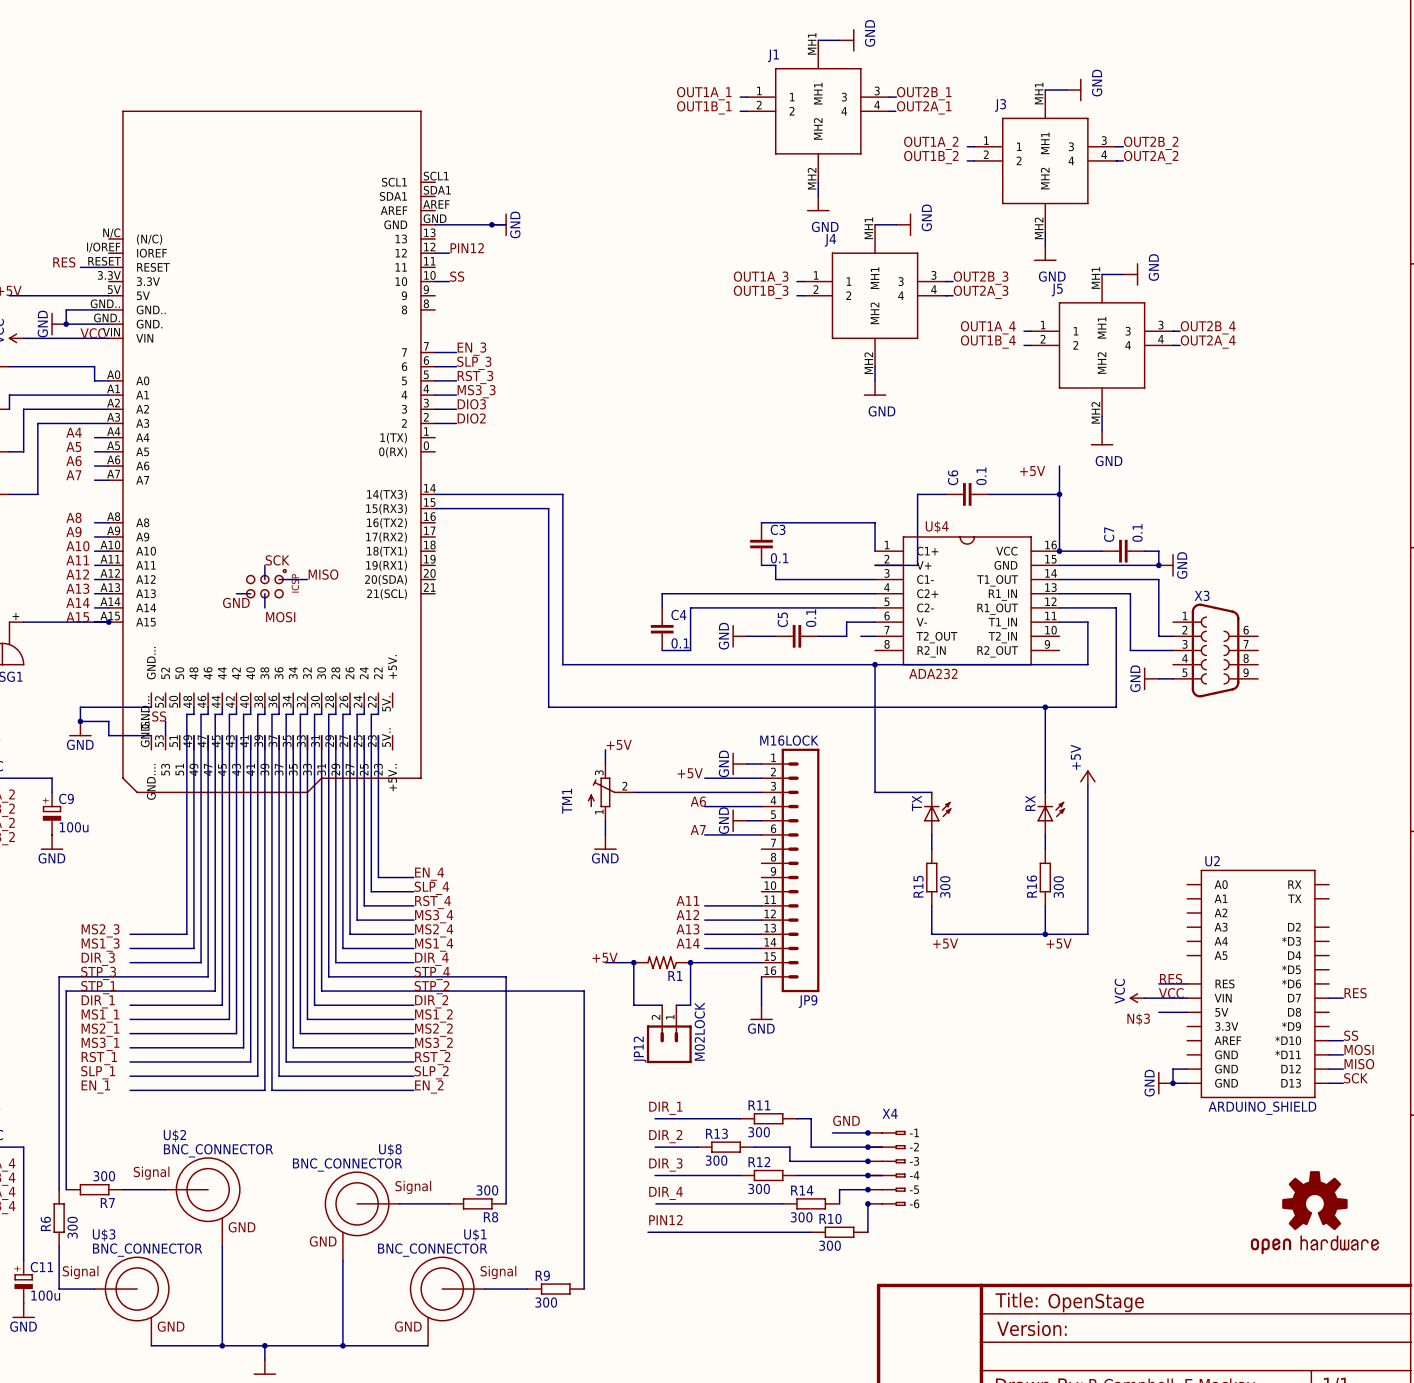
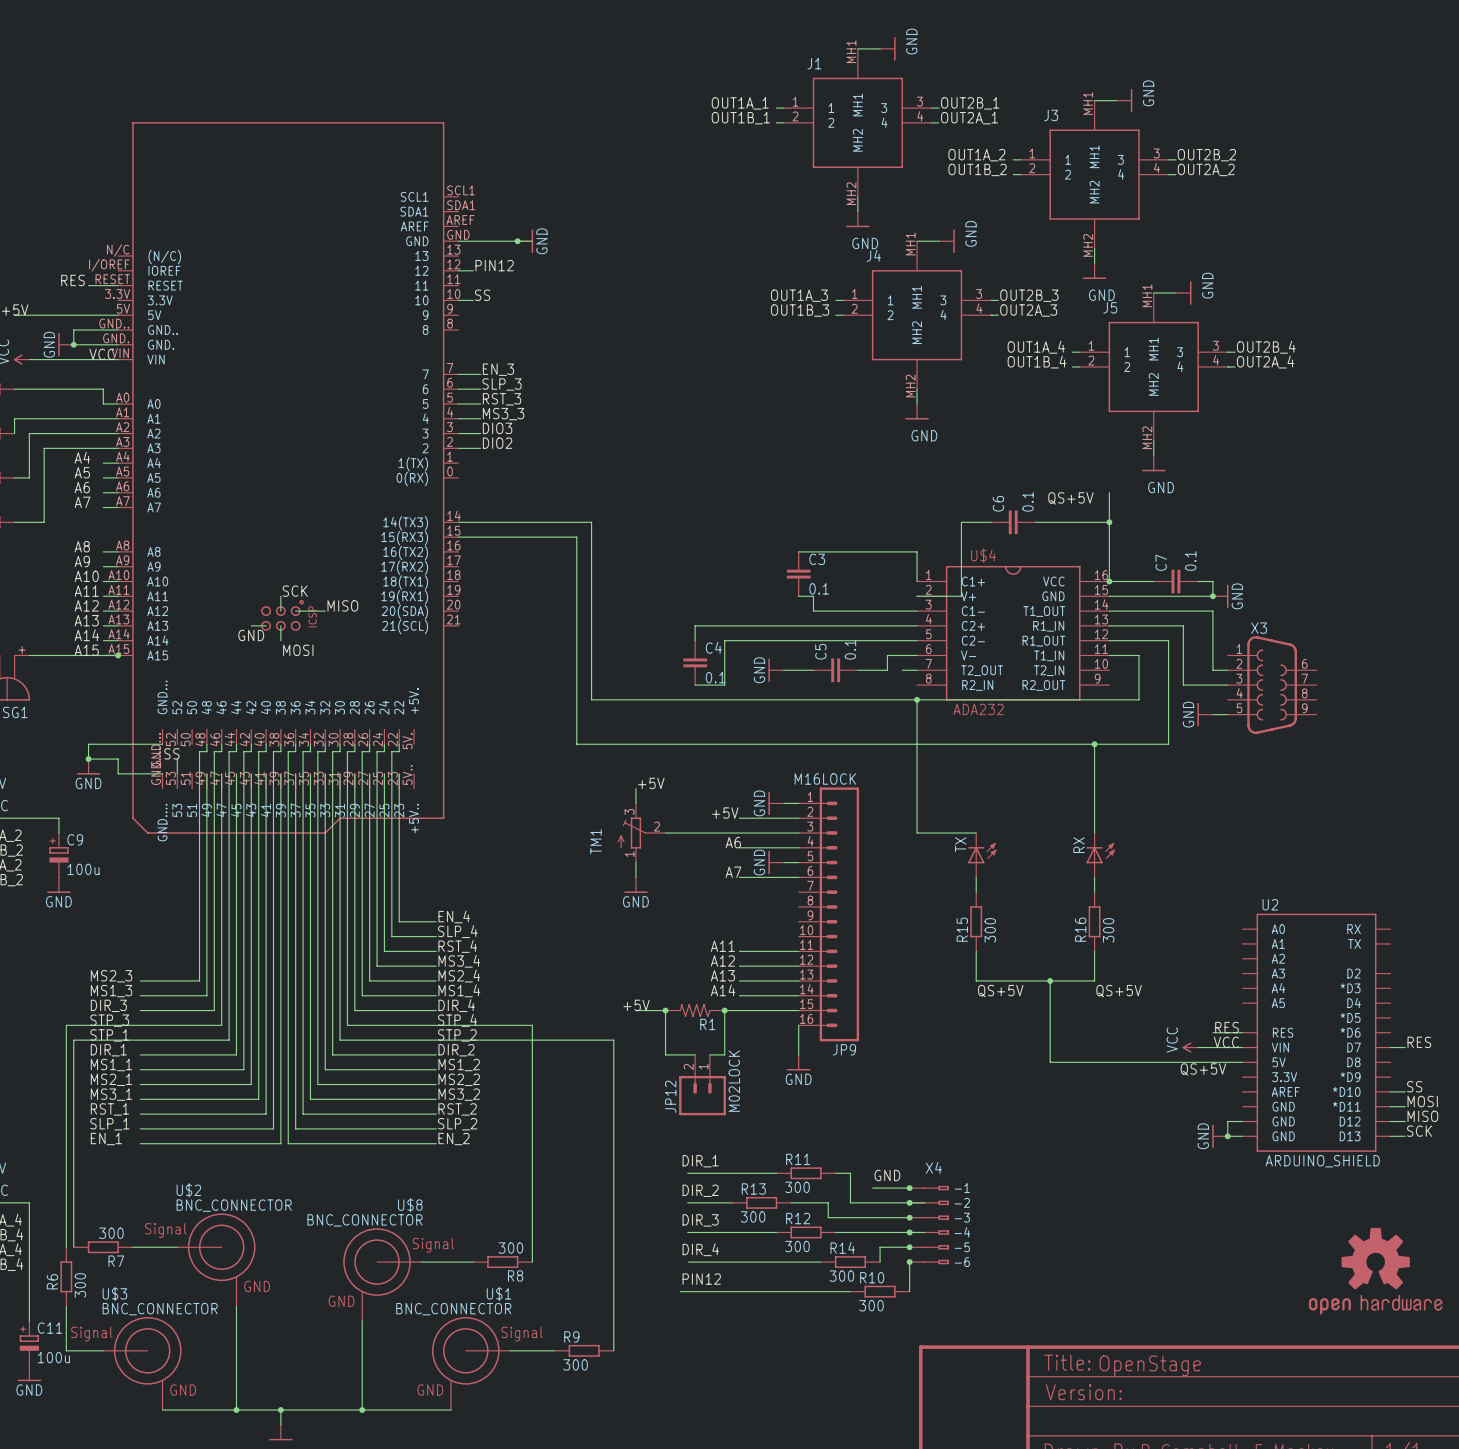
label: +5V (1032, 471) -> QS+5V (1070, 498)
power symbol: +5V (1087, 777) -> none
wire: (1087, 785) (1087, 934) (1045, 934) -> none
wire: none -> (1050, 980) (1050, 1062) (1212, 1062)
junction: none -> (1050, 980)
junction: (1045, 934) -> none
label: +5V (945, 943) -> QS+5V (1000, 991)
label: +5V (1059, 943) -> QS+5V (1119, 991)
label: N$3 (1138, 1019) -> QS+5V (1203, 1069)

